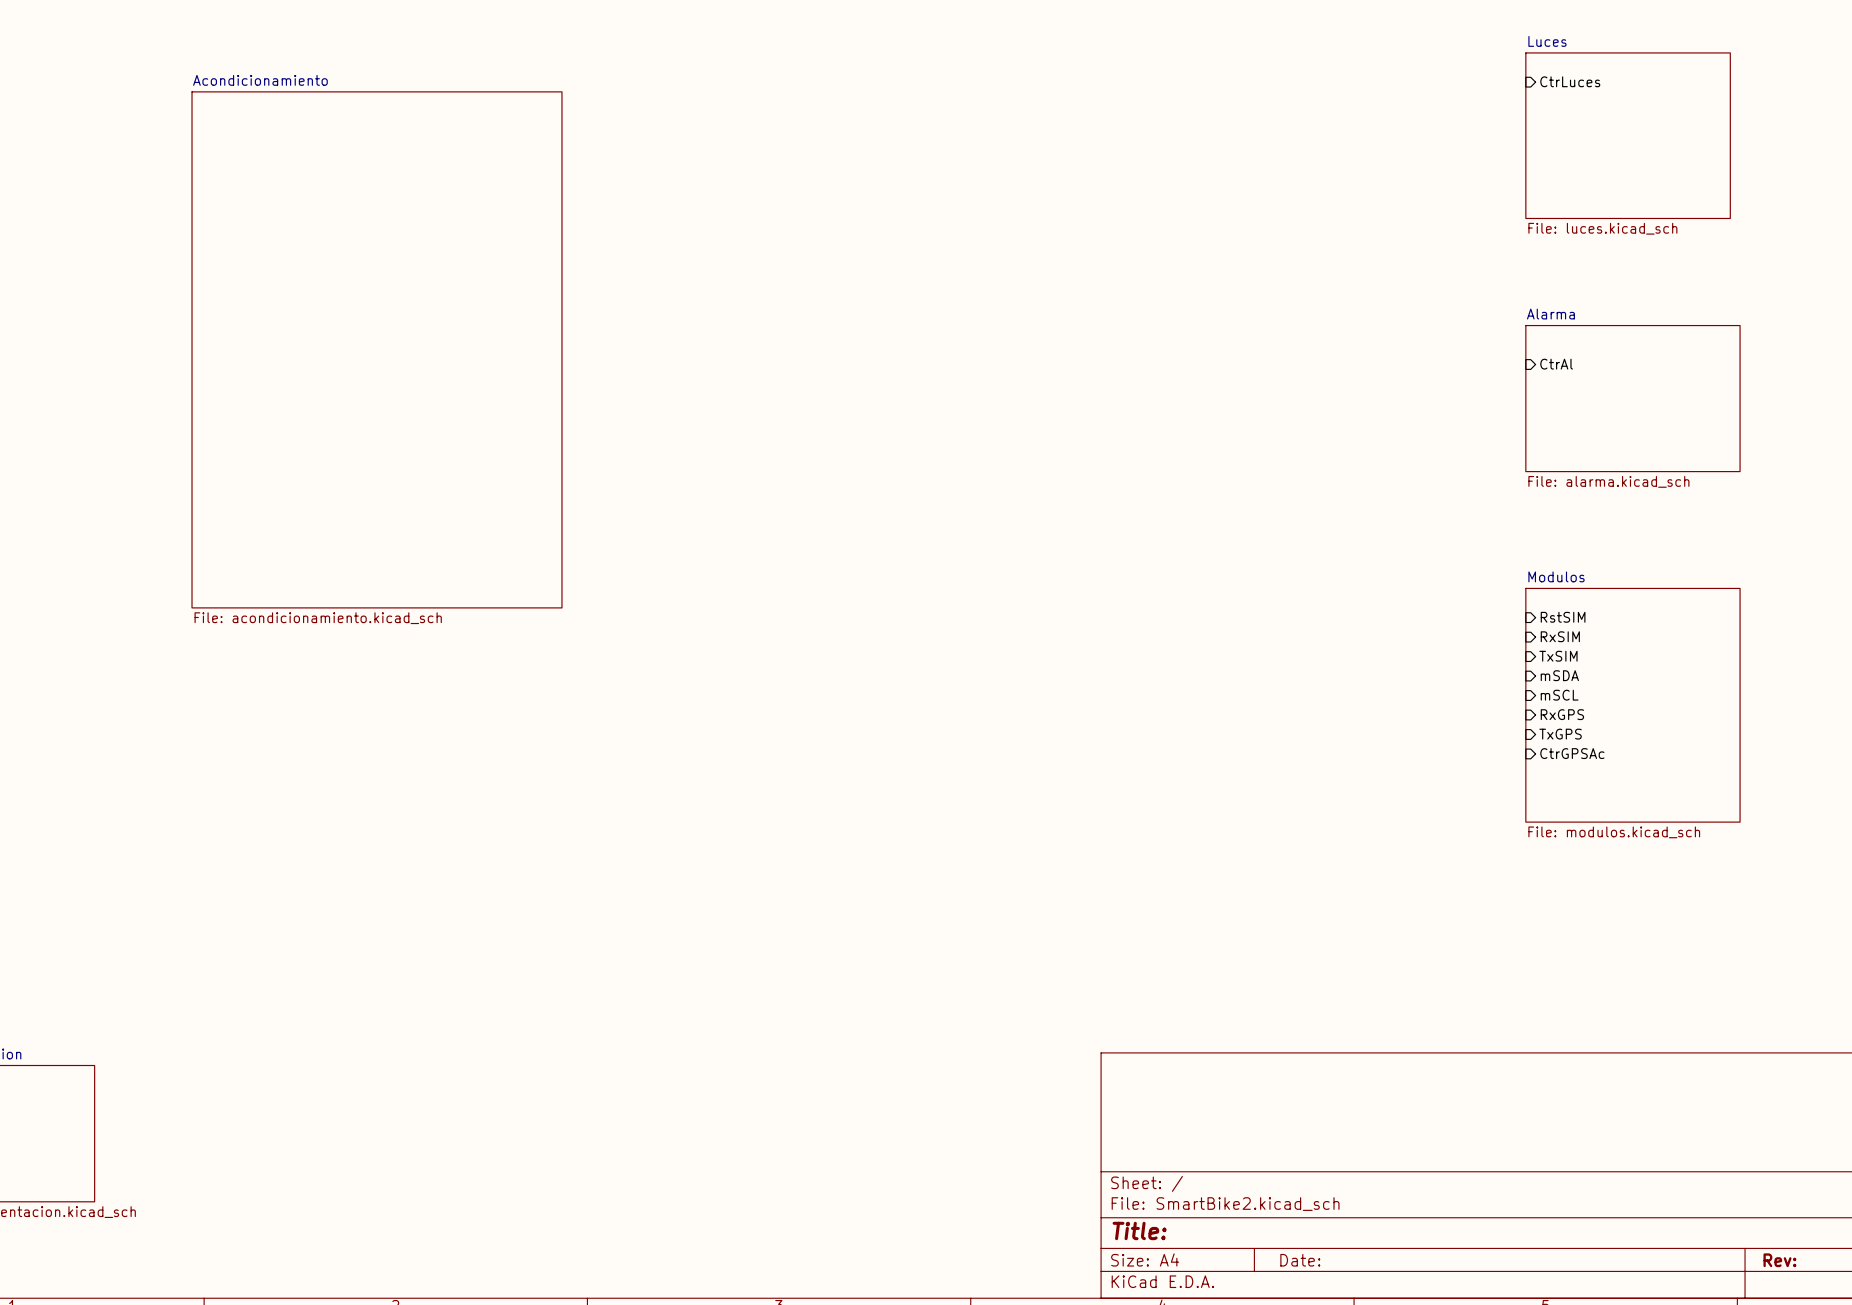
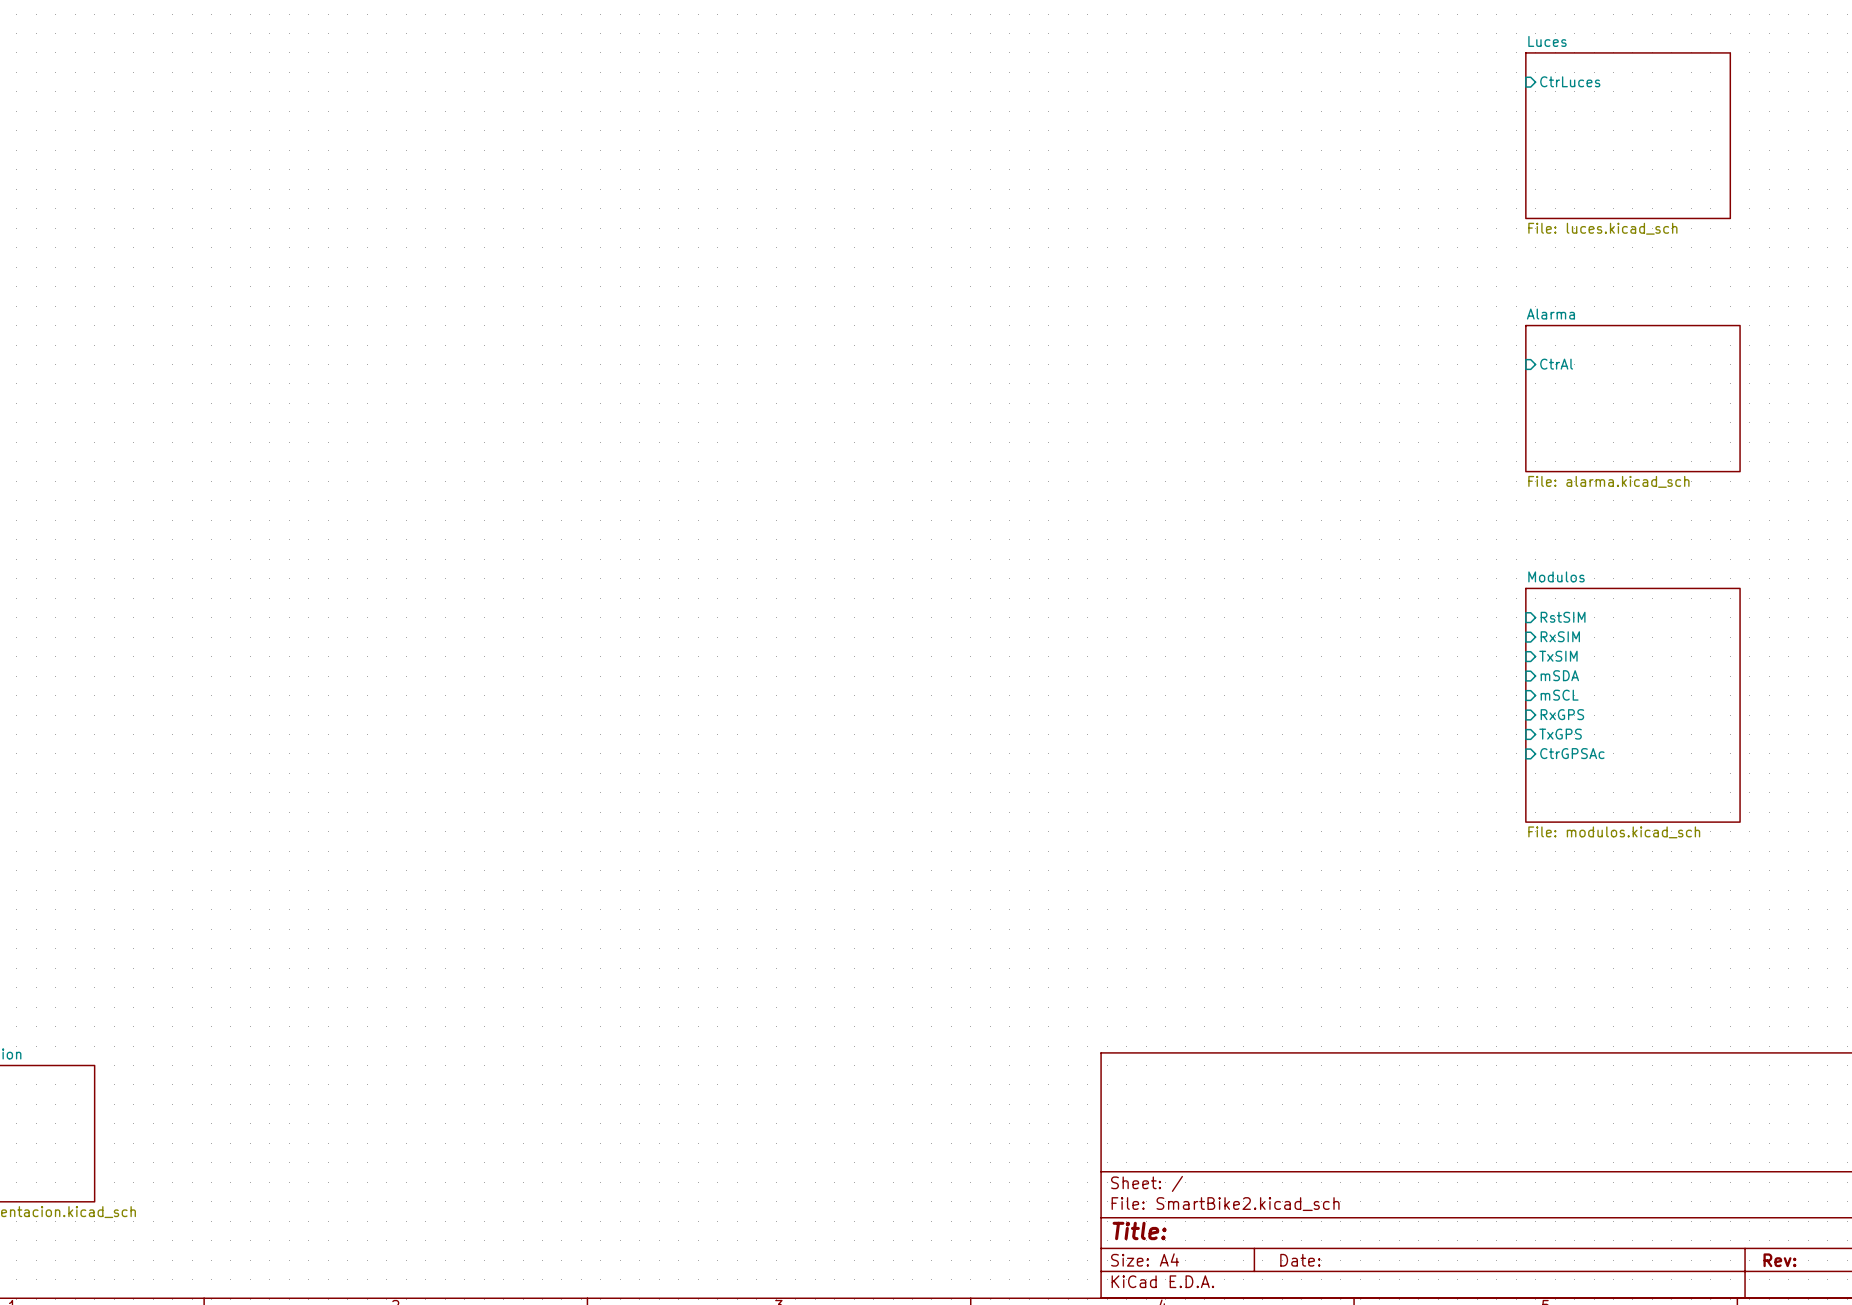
sheet Acondicionamiento: File: acondicionamiento.kicad_sch (376, 349) -> none

